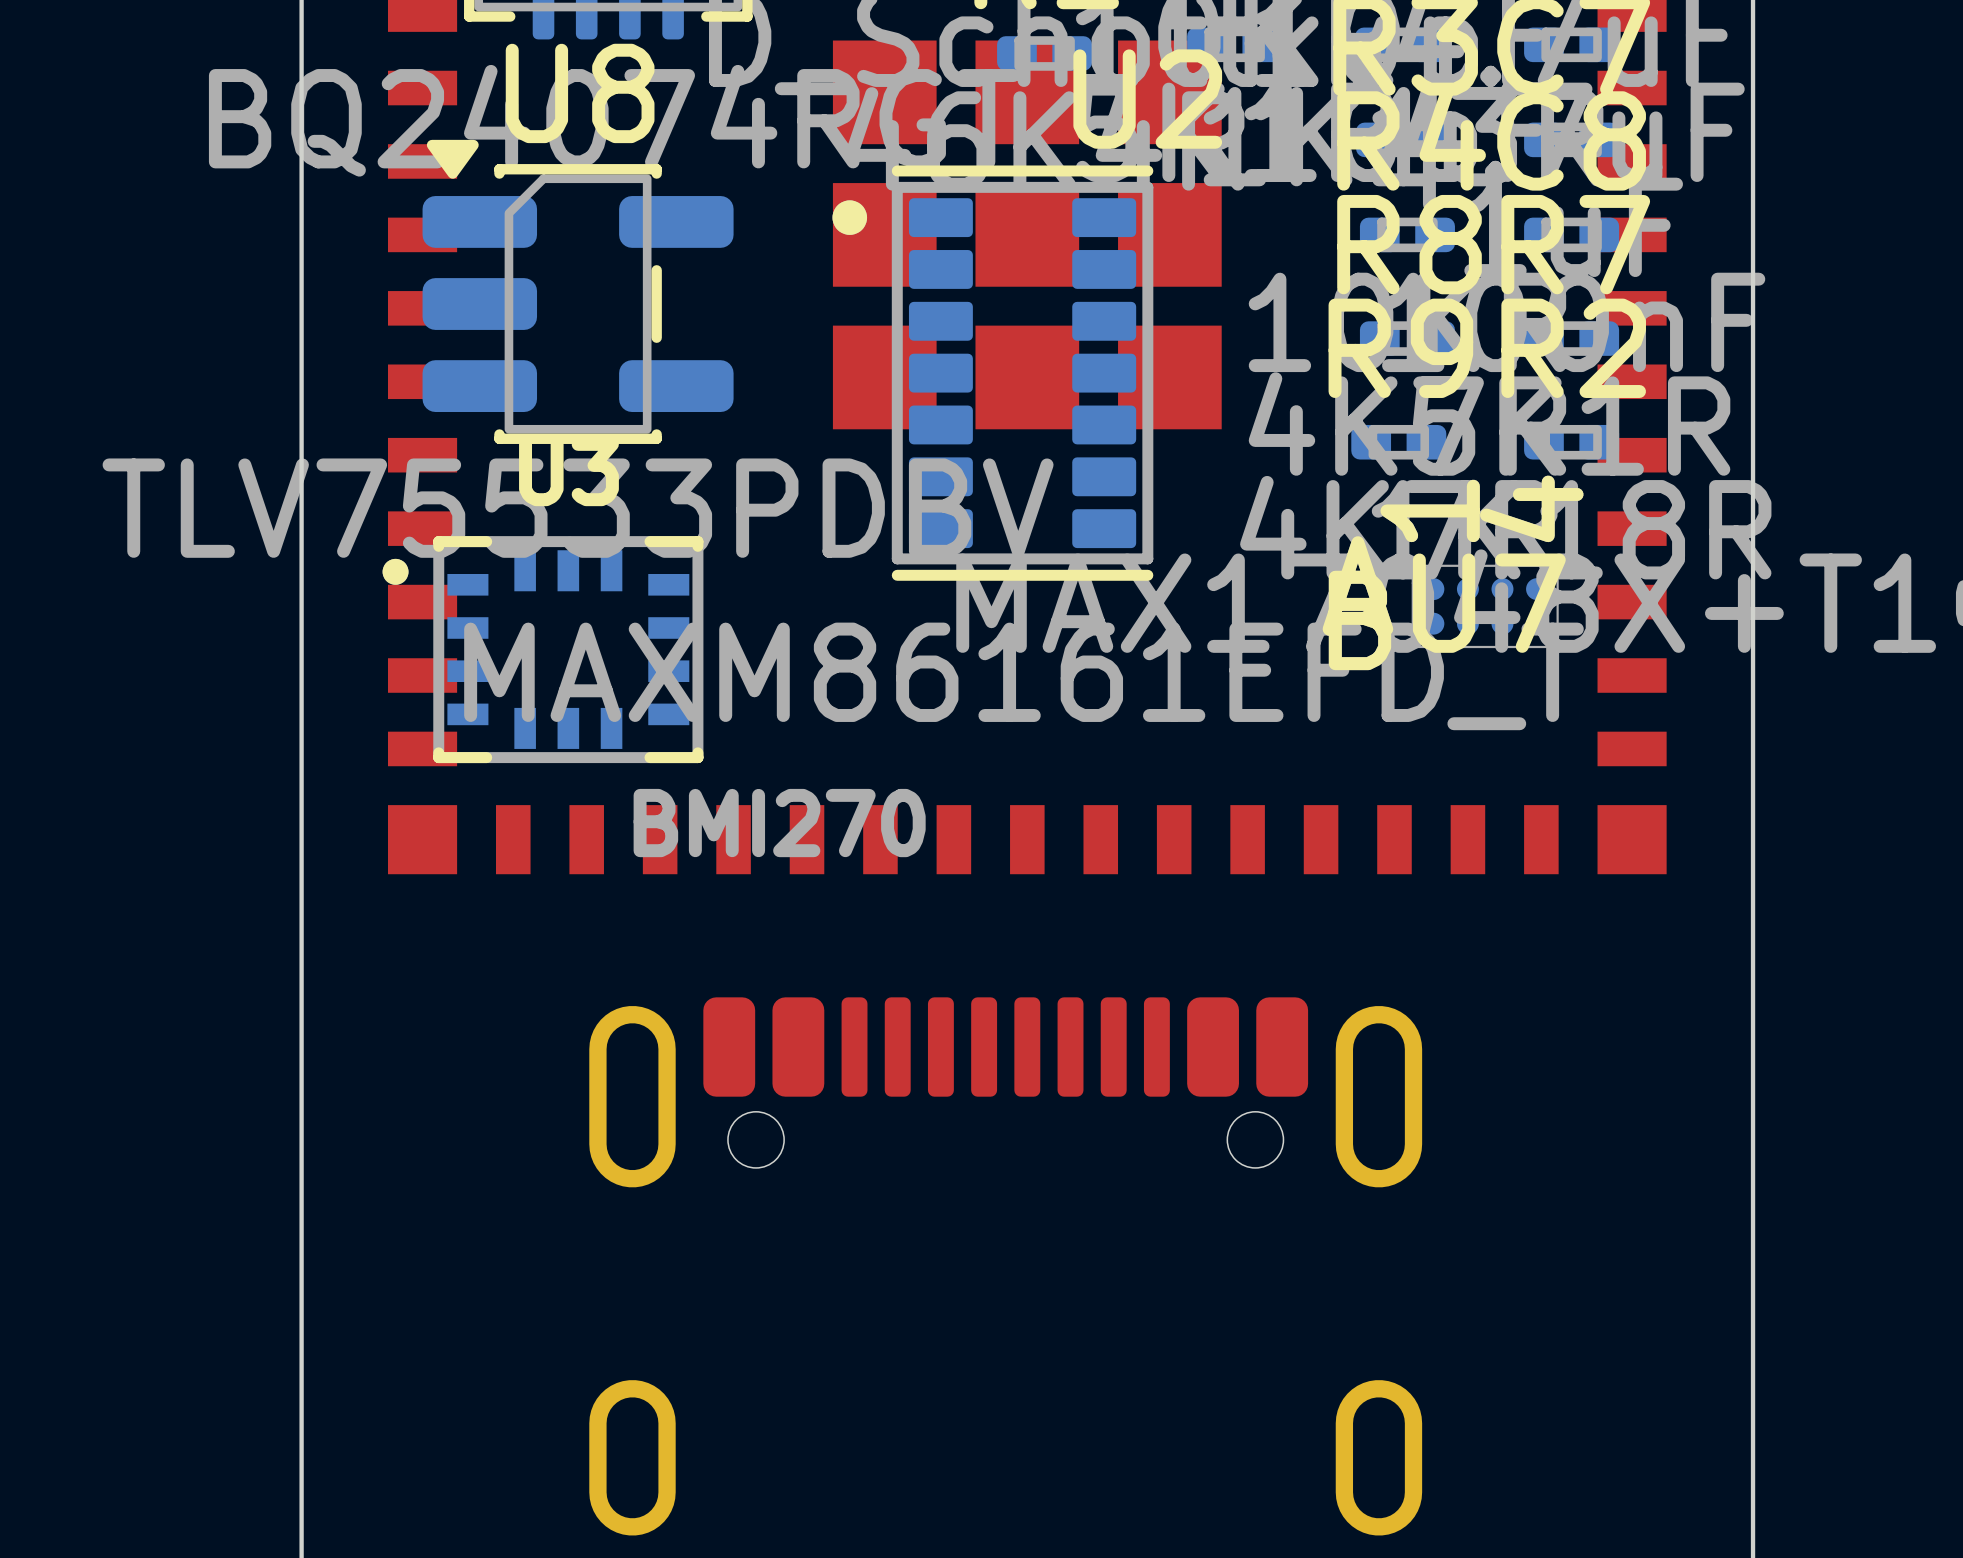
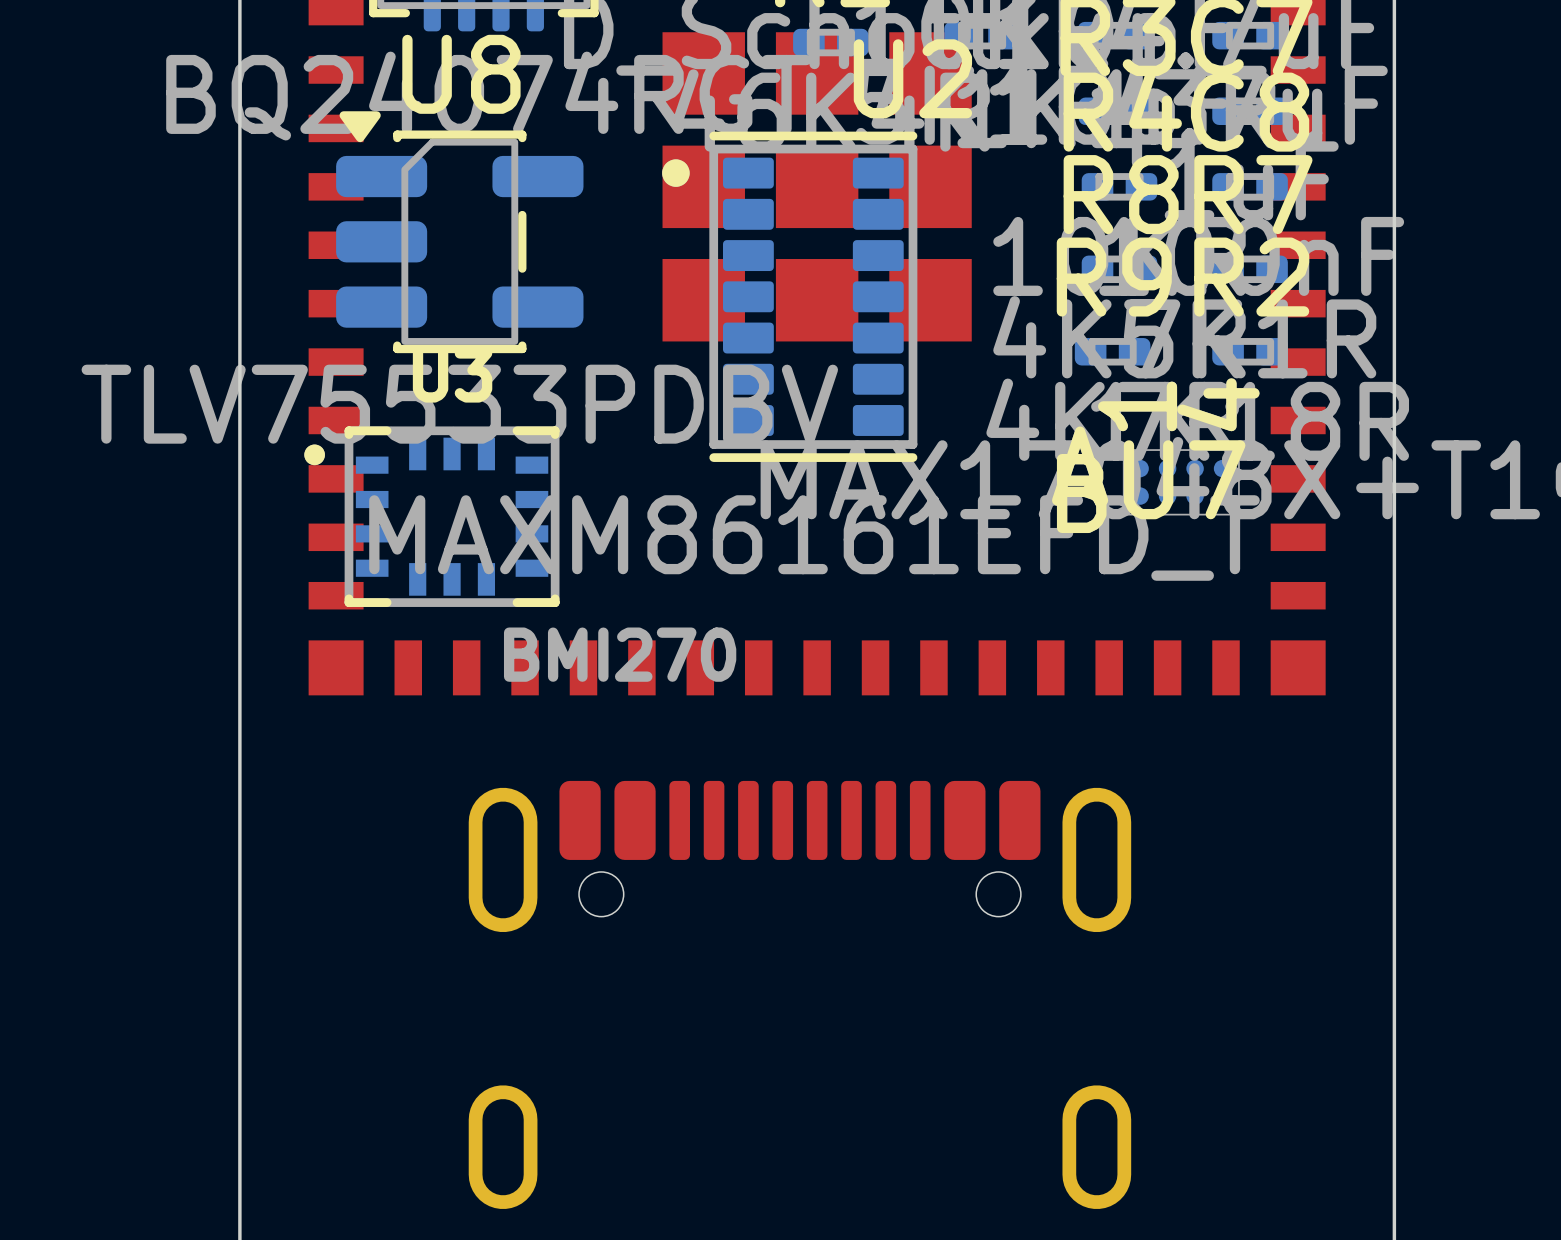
part position: (1005, 1266) -> (799, 994)

